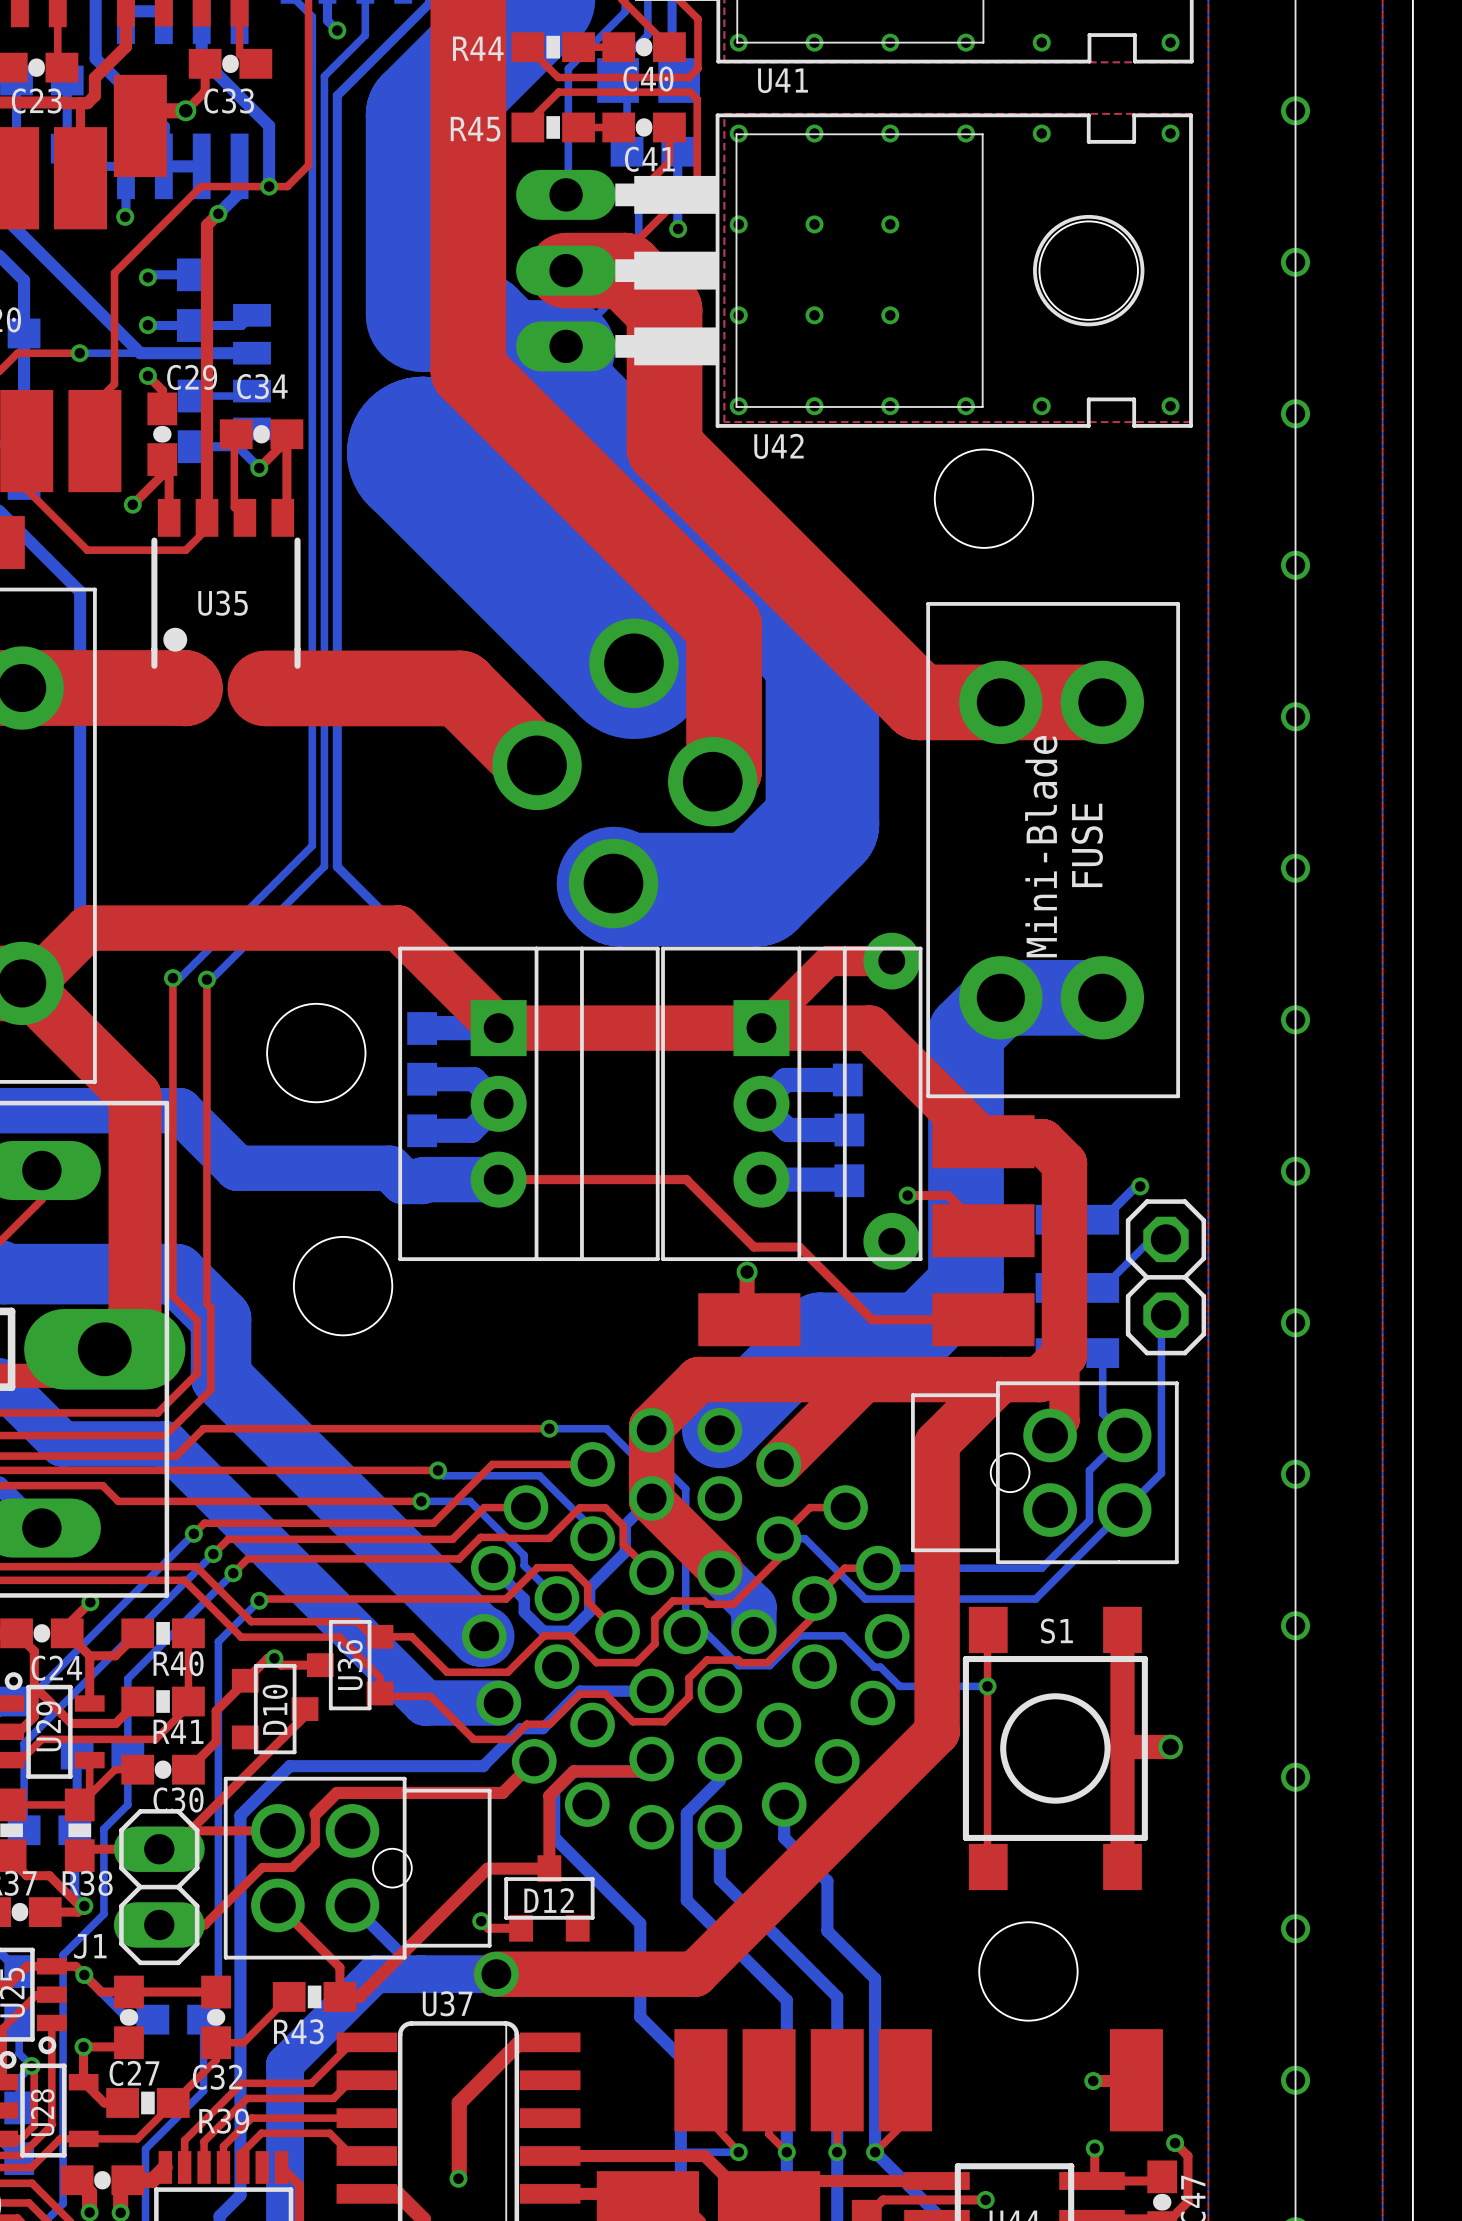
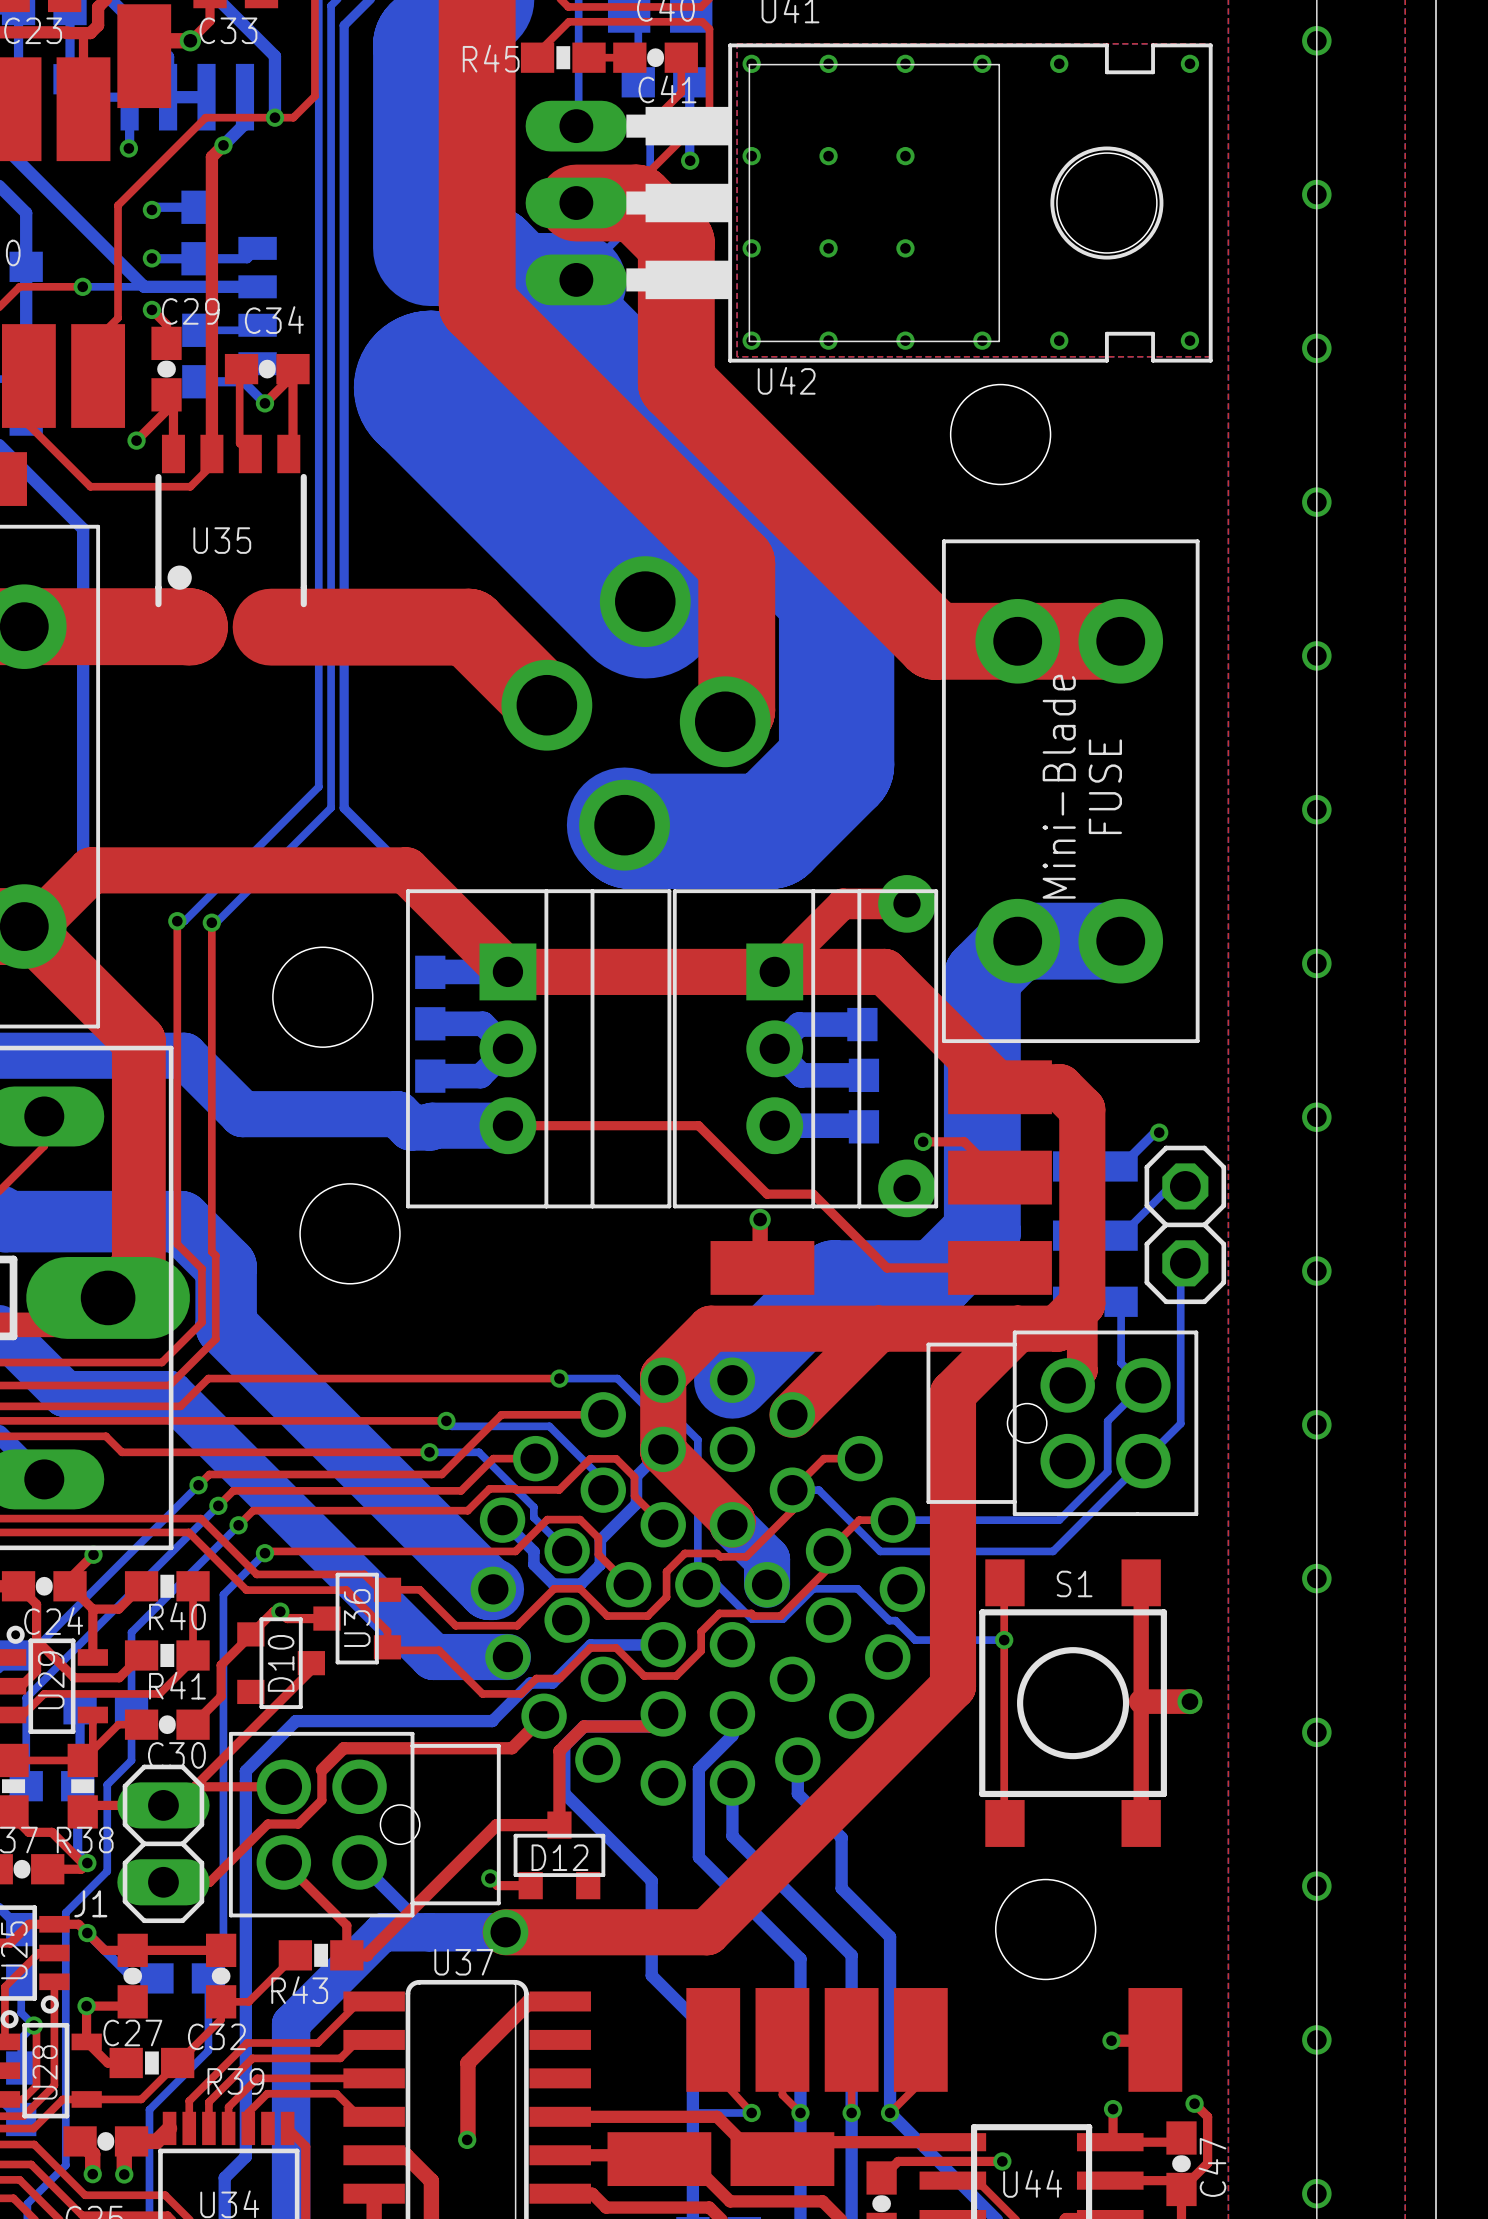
top track width: thick (1122, 1629) (1122, 1867) -> thin (1141, 1582) (1141, 1823)

